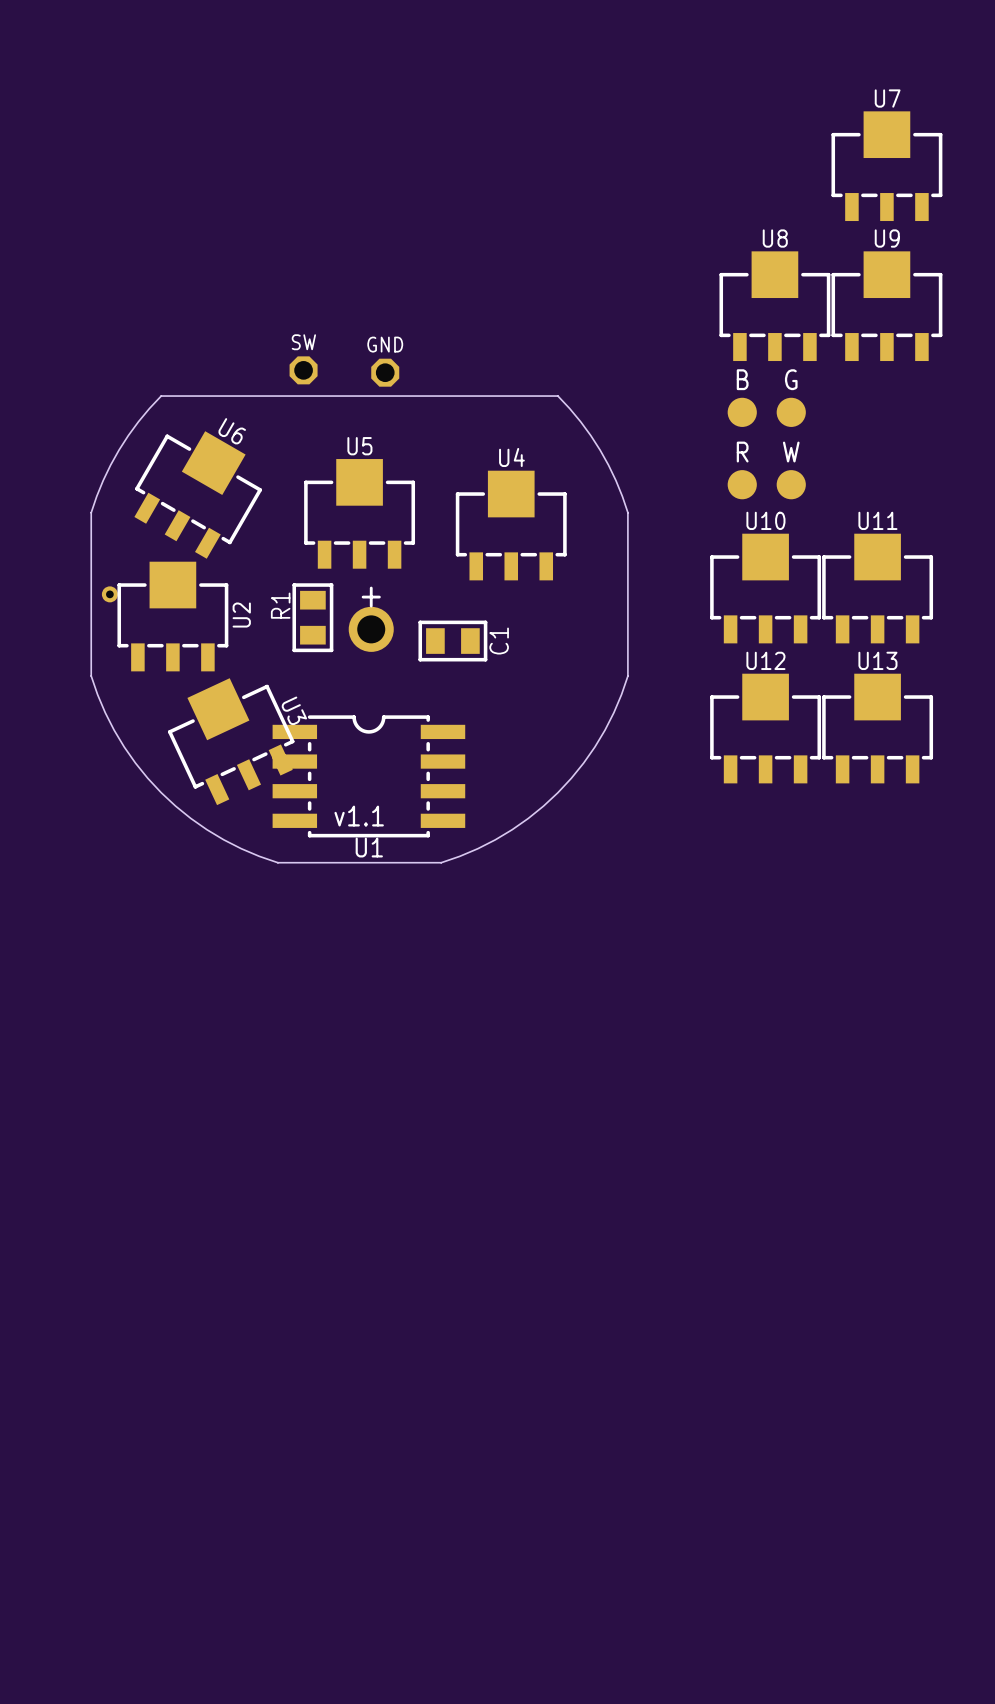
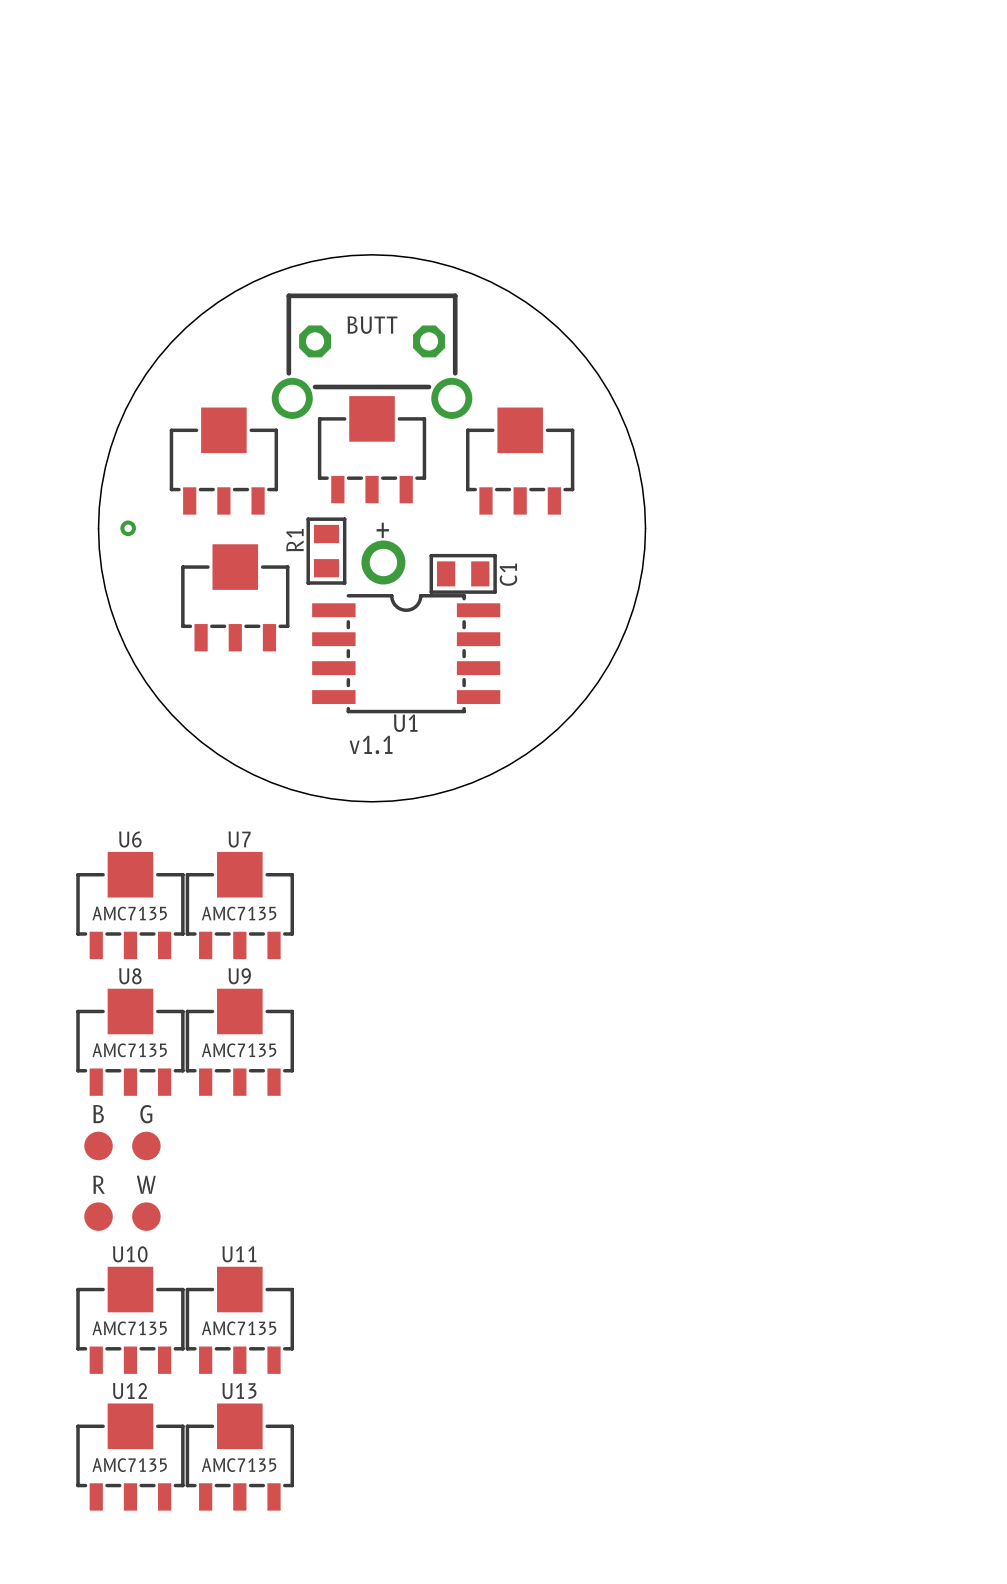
U7 position: (886, 166) -> (239, 905)
U8 position: (774, 306) -> (130, 1042)
U9 position: (886, 306) -> (239, 1042)
SW: (303, 370) -> none
GND: (385, 372) -> none
board edge: (161, 396) (557, 396) (580, 421) (600, 450) (615, 480) (627, 512) (627, 676) (605, 730) (583, 763) (557, 792) (528, 818) (495, 839) (441, 862) (277, 862) (223, 839) (190, 818) (161, 792) (135, 763) (114, 730) (91, 676) (91, 512) (103, 480) (119, 450) (138, 421) (161, 396) -> (98, 528) (101, 487) (110, 447) (117, 428) (135, 391) (146, 374) (158, 357) (186, 327) (217, 302) (235, 291) (272, 273) (291, 266) (331, 257) (372, 254) (412, 257) (452, 266) (471, 273) (508, 291) (526, 302) (558, 327) (585, 357) (598, 374) (608, 391) (626, 428) (633, 447) (642, 487) (645, 528) (642, 569) (633, 608) (626, 628) (608, 665) (598, 682) (572, 714) (542, 742) (526, 754) (508, 765) (471, 782) (452, 789) (412, 798) (372, 801) (331, 798) (291, 789) (272, 782) (235, 765) (217, 754) (186, 728) (158, 698) (146, 682) (135, 665) (117, 628) (110, 608) (101, 569) (98, 528)
B: (742, 412) -> none
G: (791, 412) -> none
BUTT: none -> (372, 356)
U5 name: U5 (359, 446) -> none
U4 name: U4 (511, 457) -> none
R: (742, 484) -> none
W: (791, 484) -> none
U6 rotation: 0° (198, 494) -> 30° counterclockwise (130, 905)
U6 position: (198, 494) -> (130, 905)
part: none -> (223, 461)
U10 position: (765, 588) -> (130, 1320)
U11 position: (877, 588) -> (239, 1320)
U2: (172, 616) -> none
part: none -> (235, 597)
U12 position: (765, 728) -> (130, 1457)
U13 position: (877, 728) -> (239, 1457)
U3: (231, 741) -> none
U1 position: (368, 776) -> (406, 653)
U6 value: none -> AMC7135 (129, 913)
U7 value: none -> AMC7135 (239, 913)
U8 value: none -> AMC7135 (129, 1050)
U9 value: none -> AMC7135 (239, 1050)
B: none -> (98, 1145)
G: none -> (146, 1145)
R: none -> (98, 1216)
W: none -> (146, 1216)
U10 value: none -> AMC7135 (129, 1328)
U11 value: none -> AMC7135 (239, 1328)
U12 value: none -> AMC7135 (129, 1465)
U13 value: none -> AMC7135 (239, 1465)

